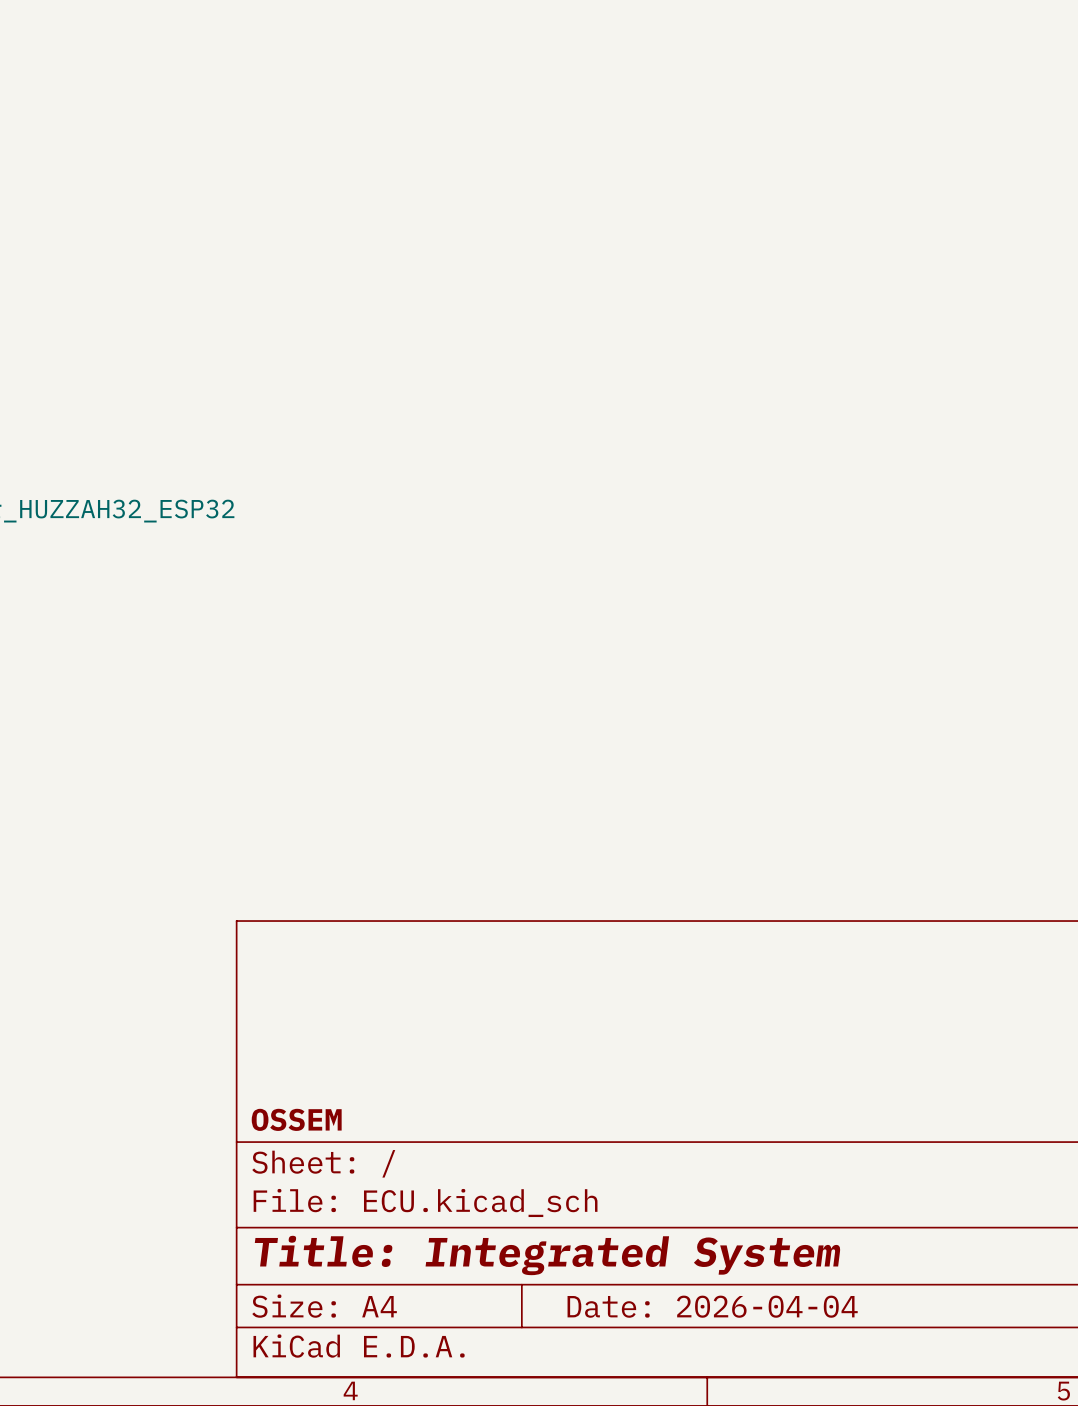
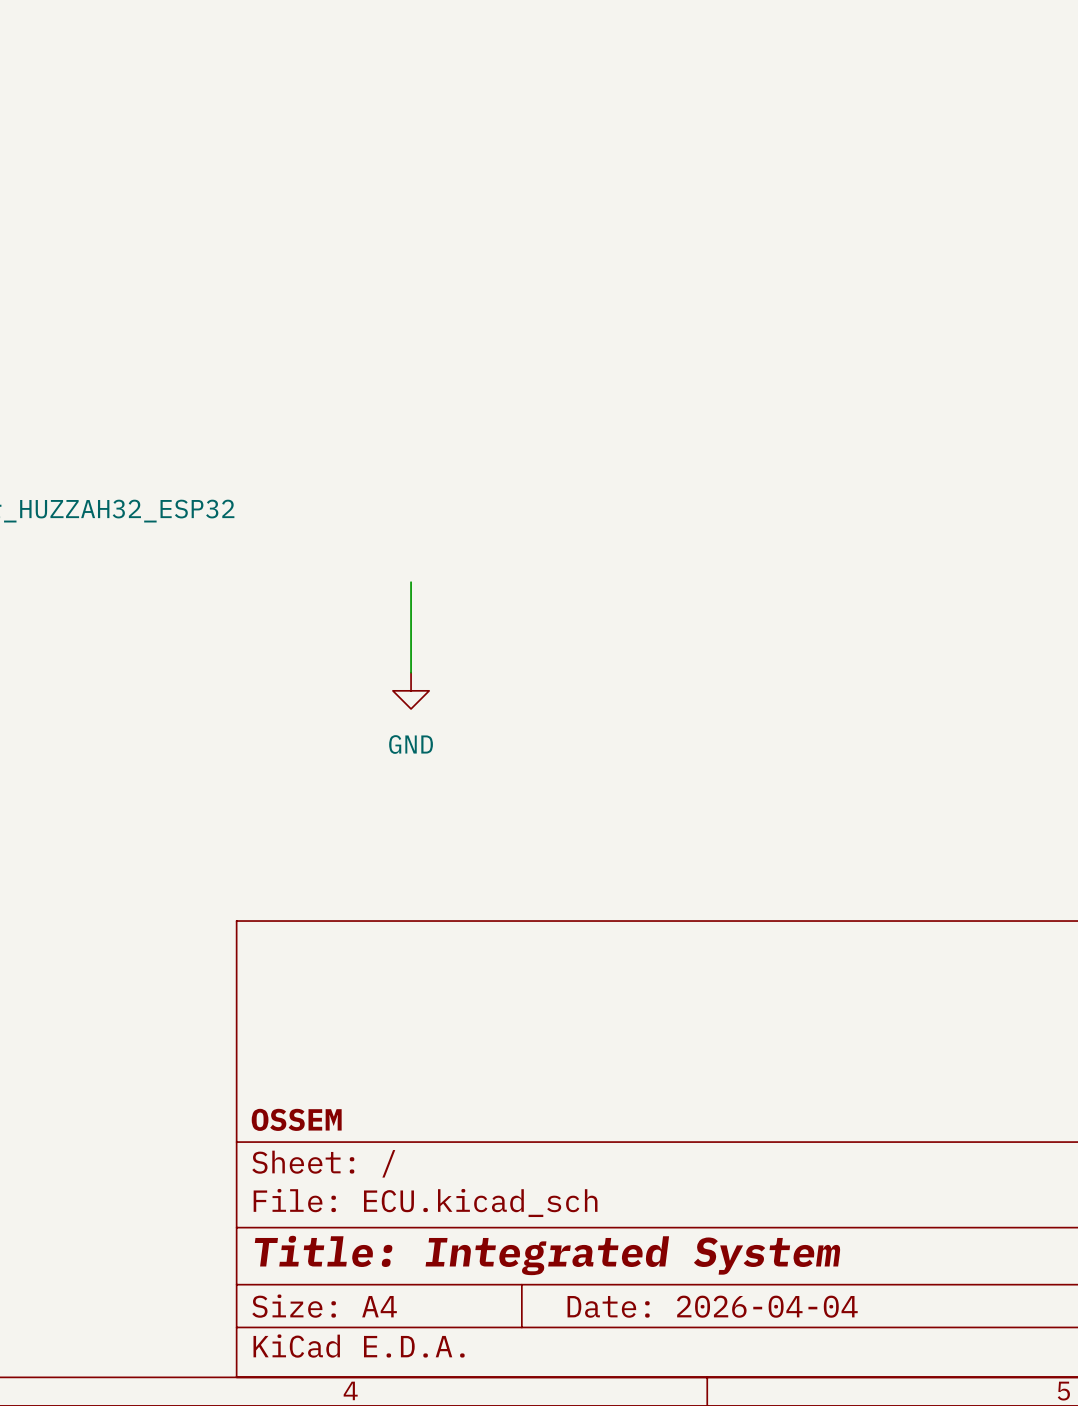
wire: none -> (411, 582) (411, 672)
power symbol: none -> GND (411, 690)

